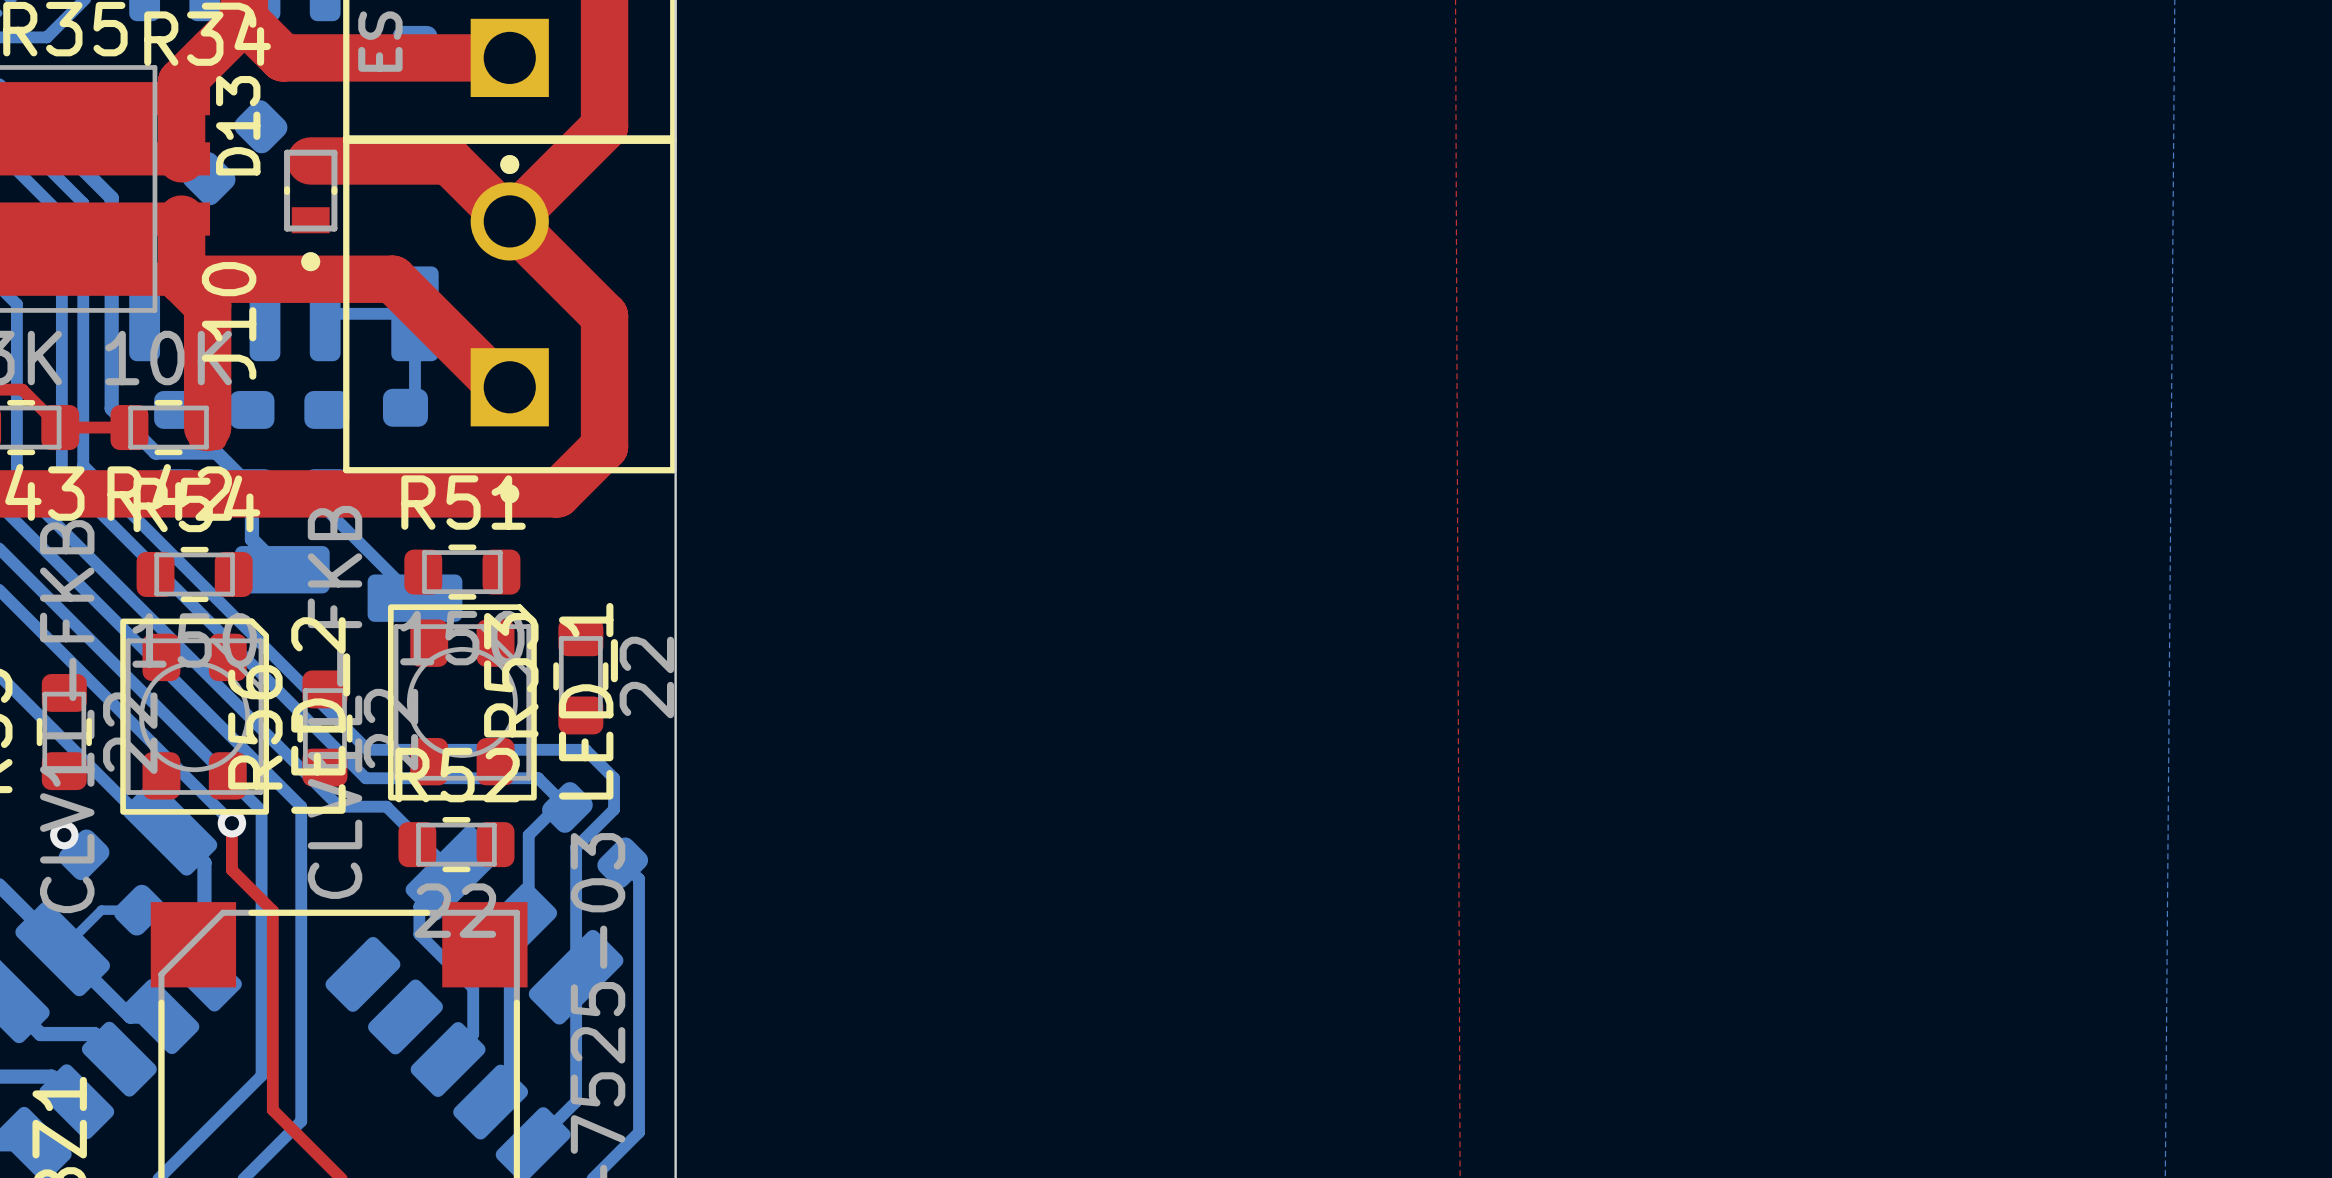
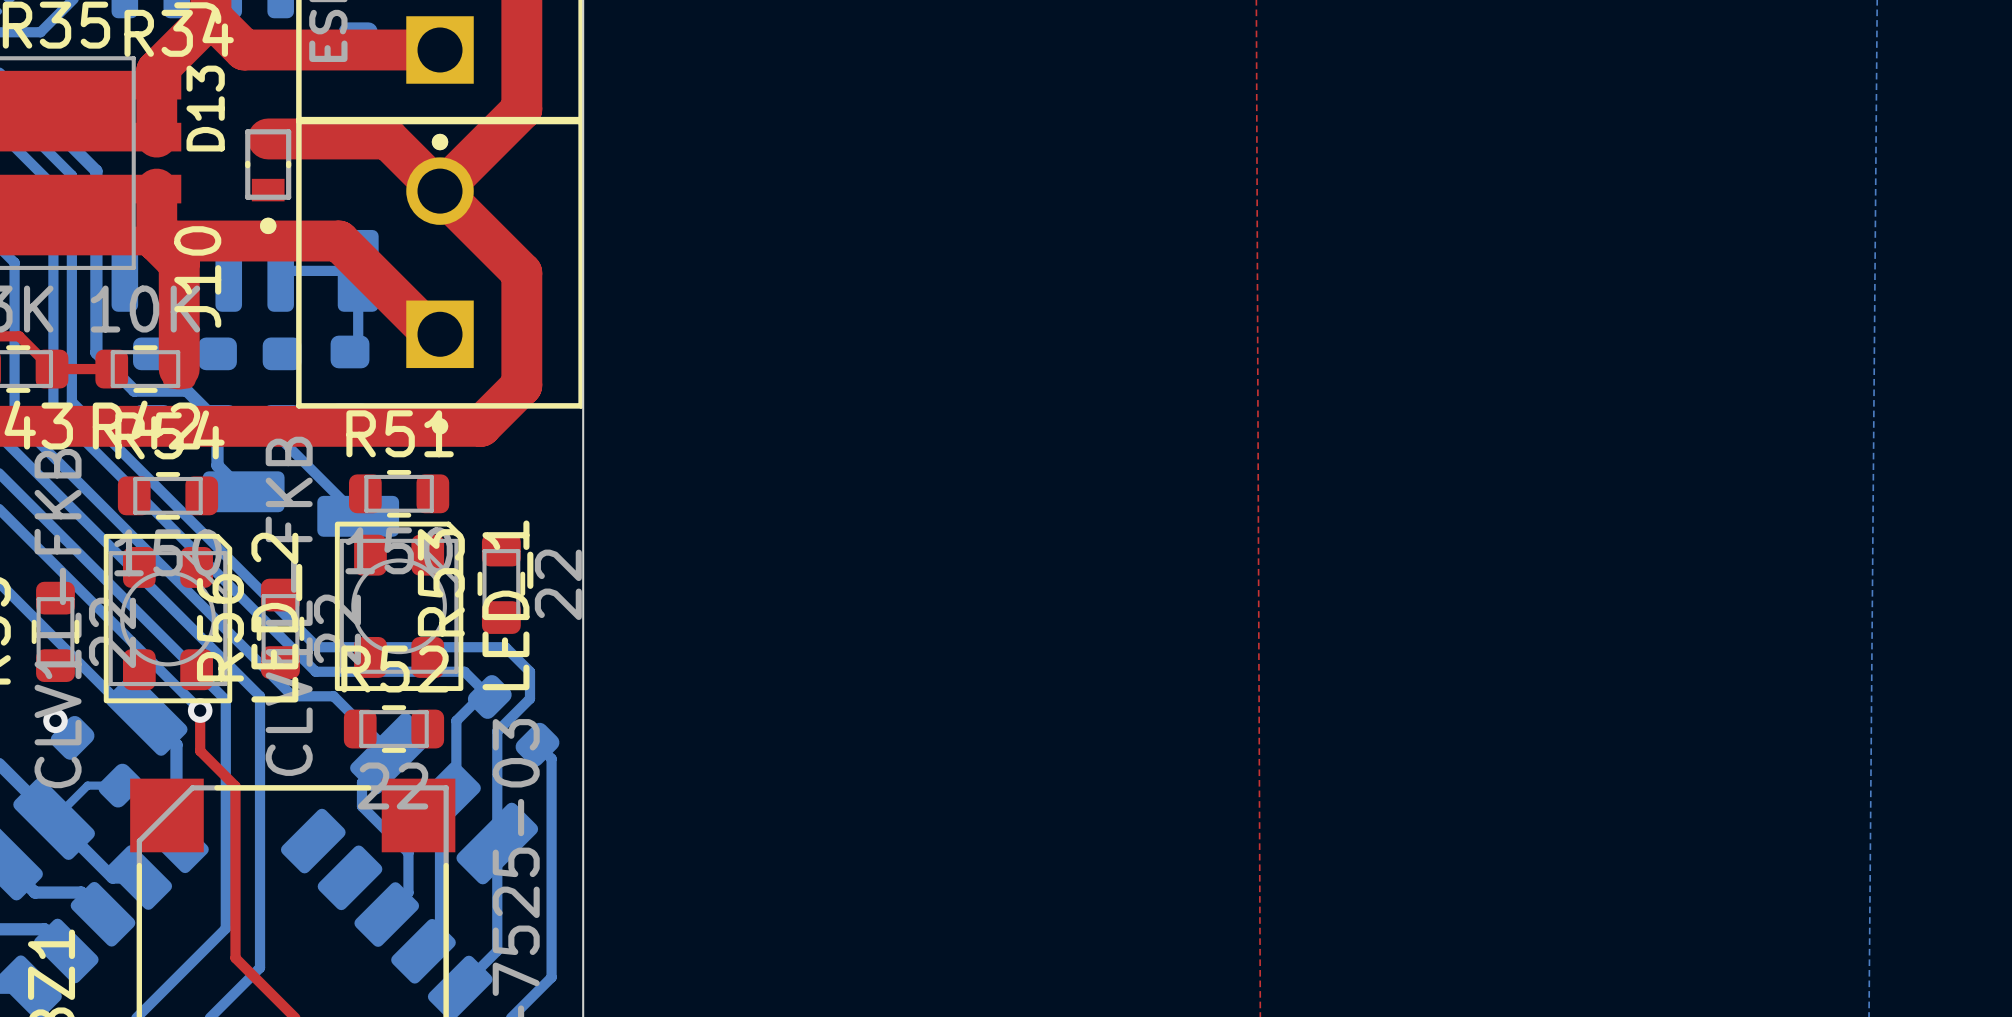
part: (234, 152) -> none

